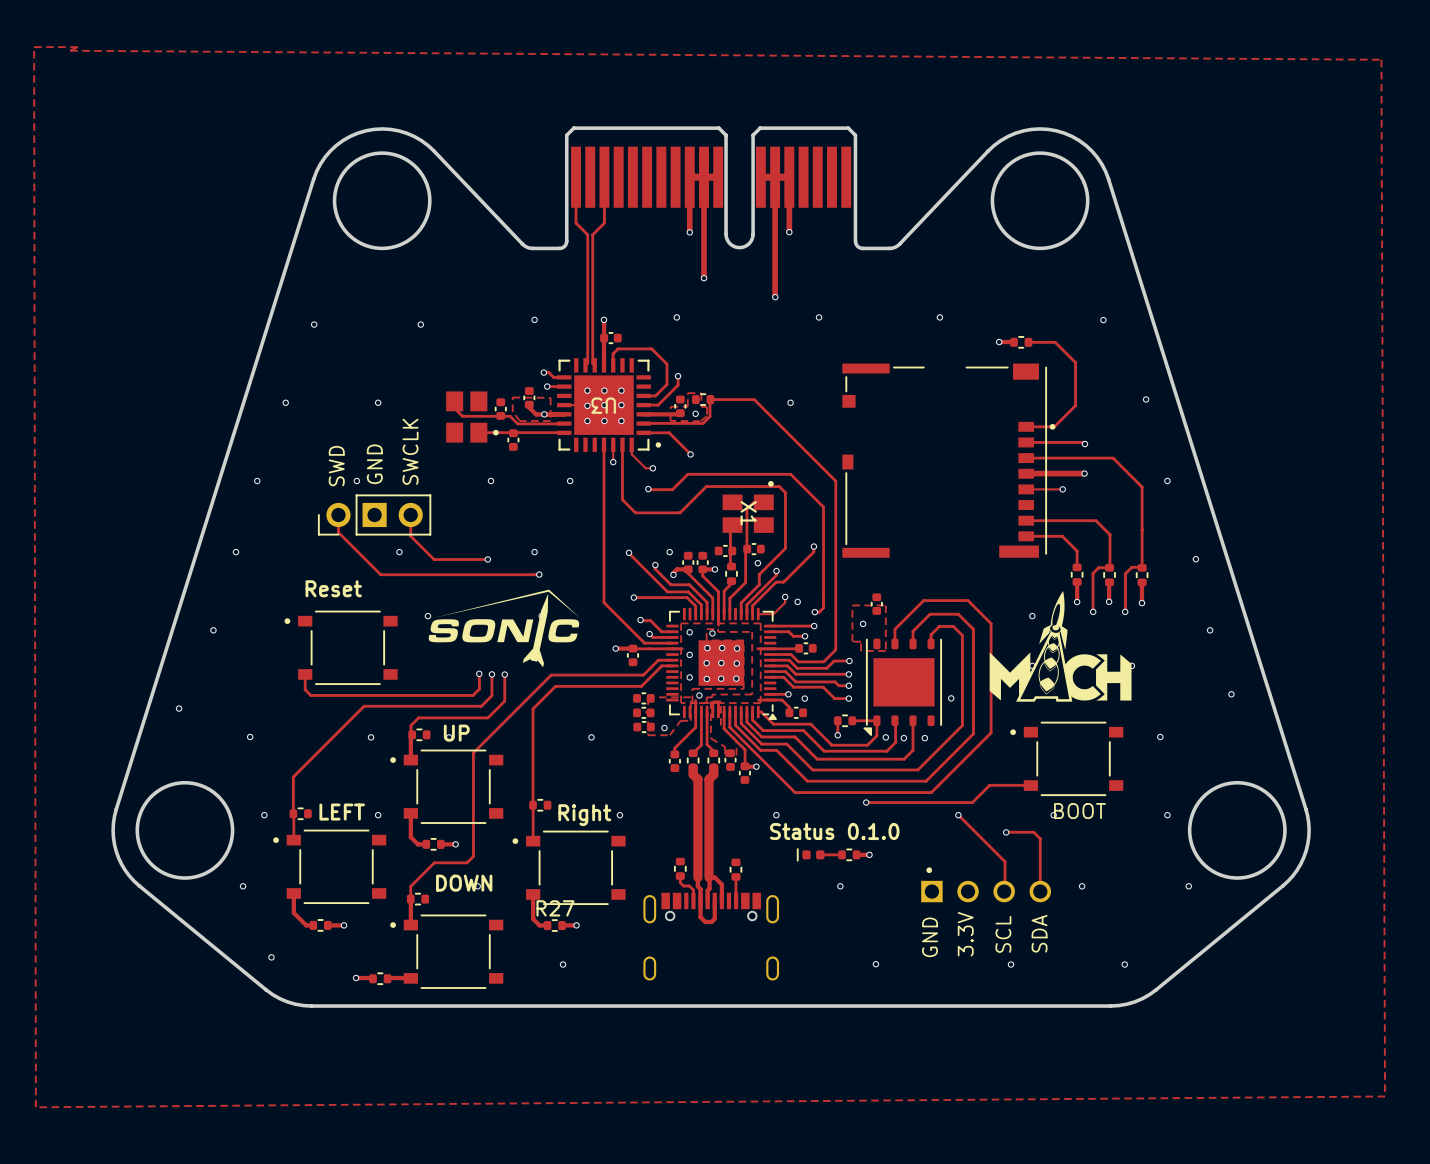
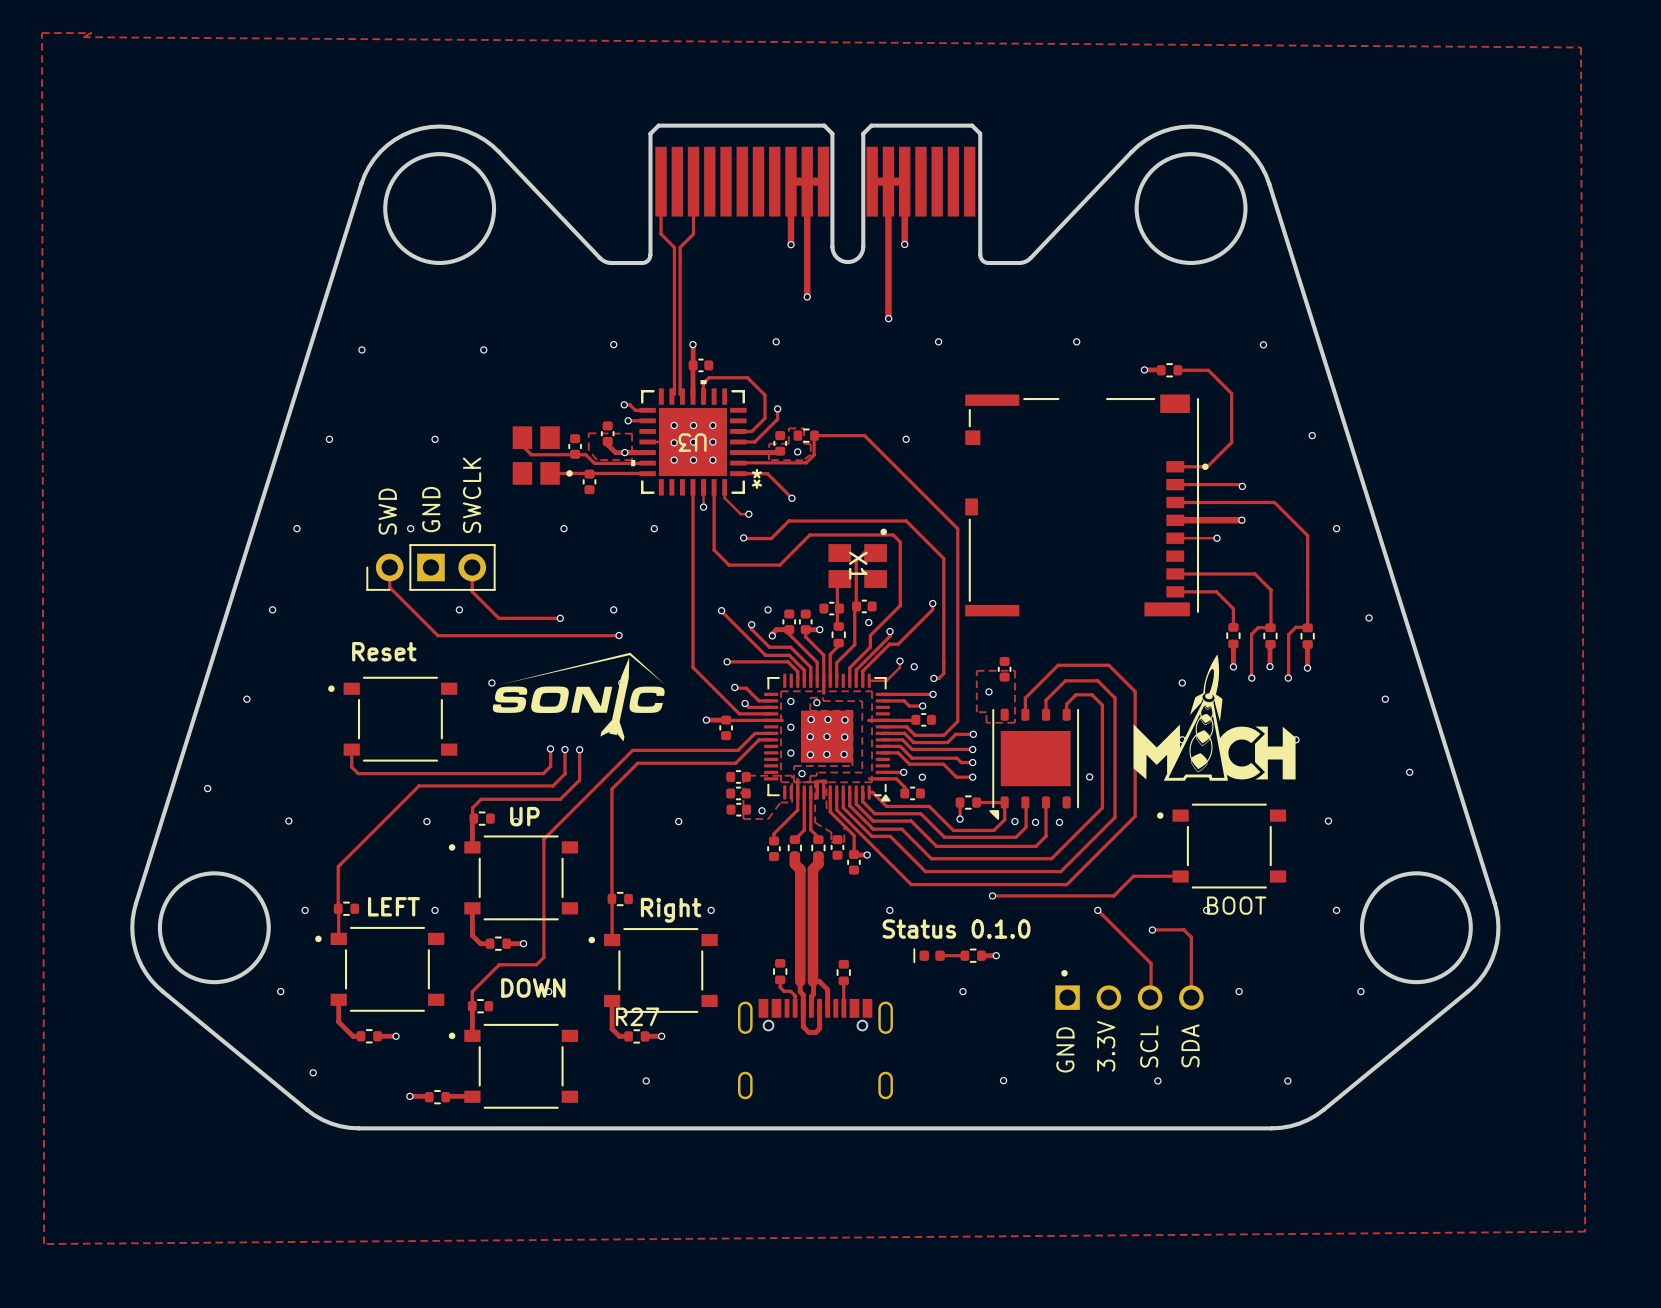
U3 footprint: [557, 358, 662, 453] -> [631, 380, 747, 496]

